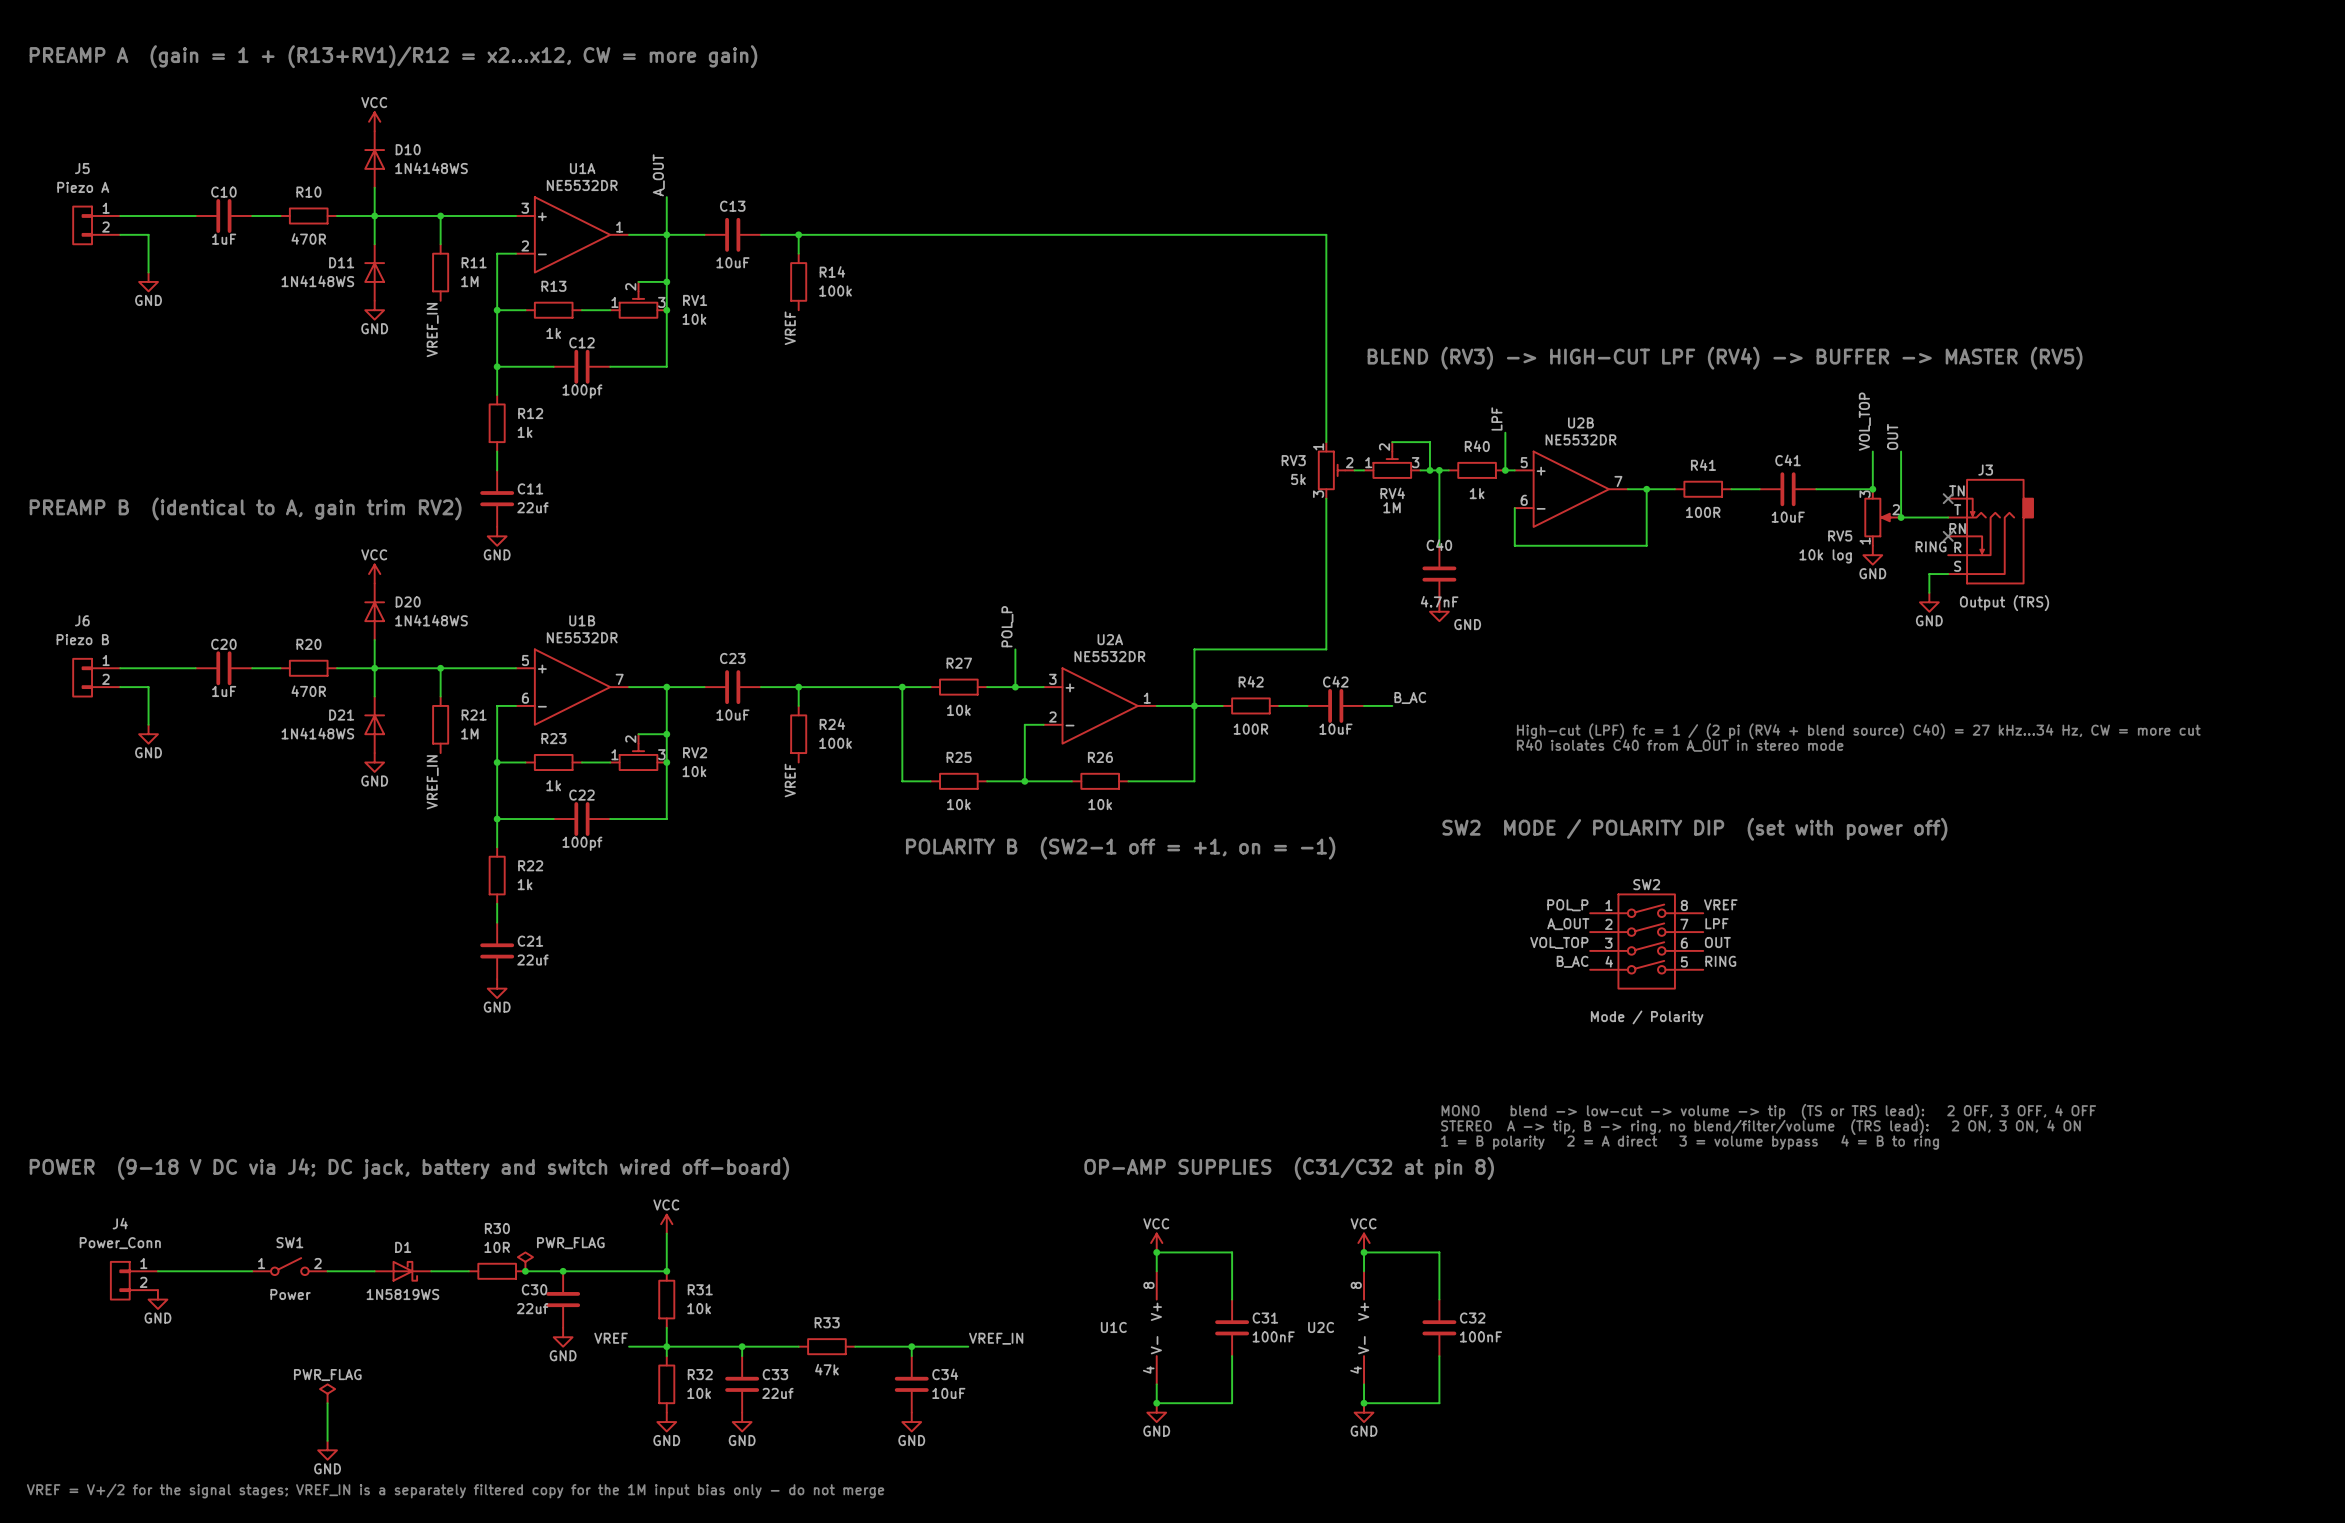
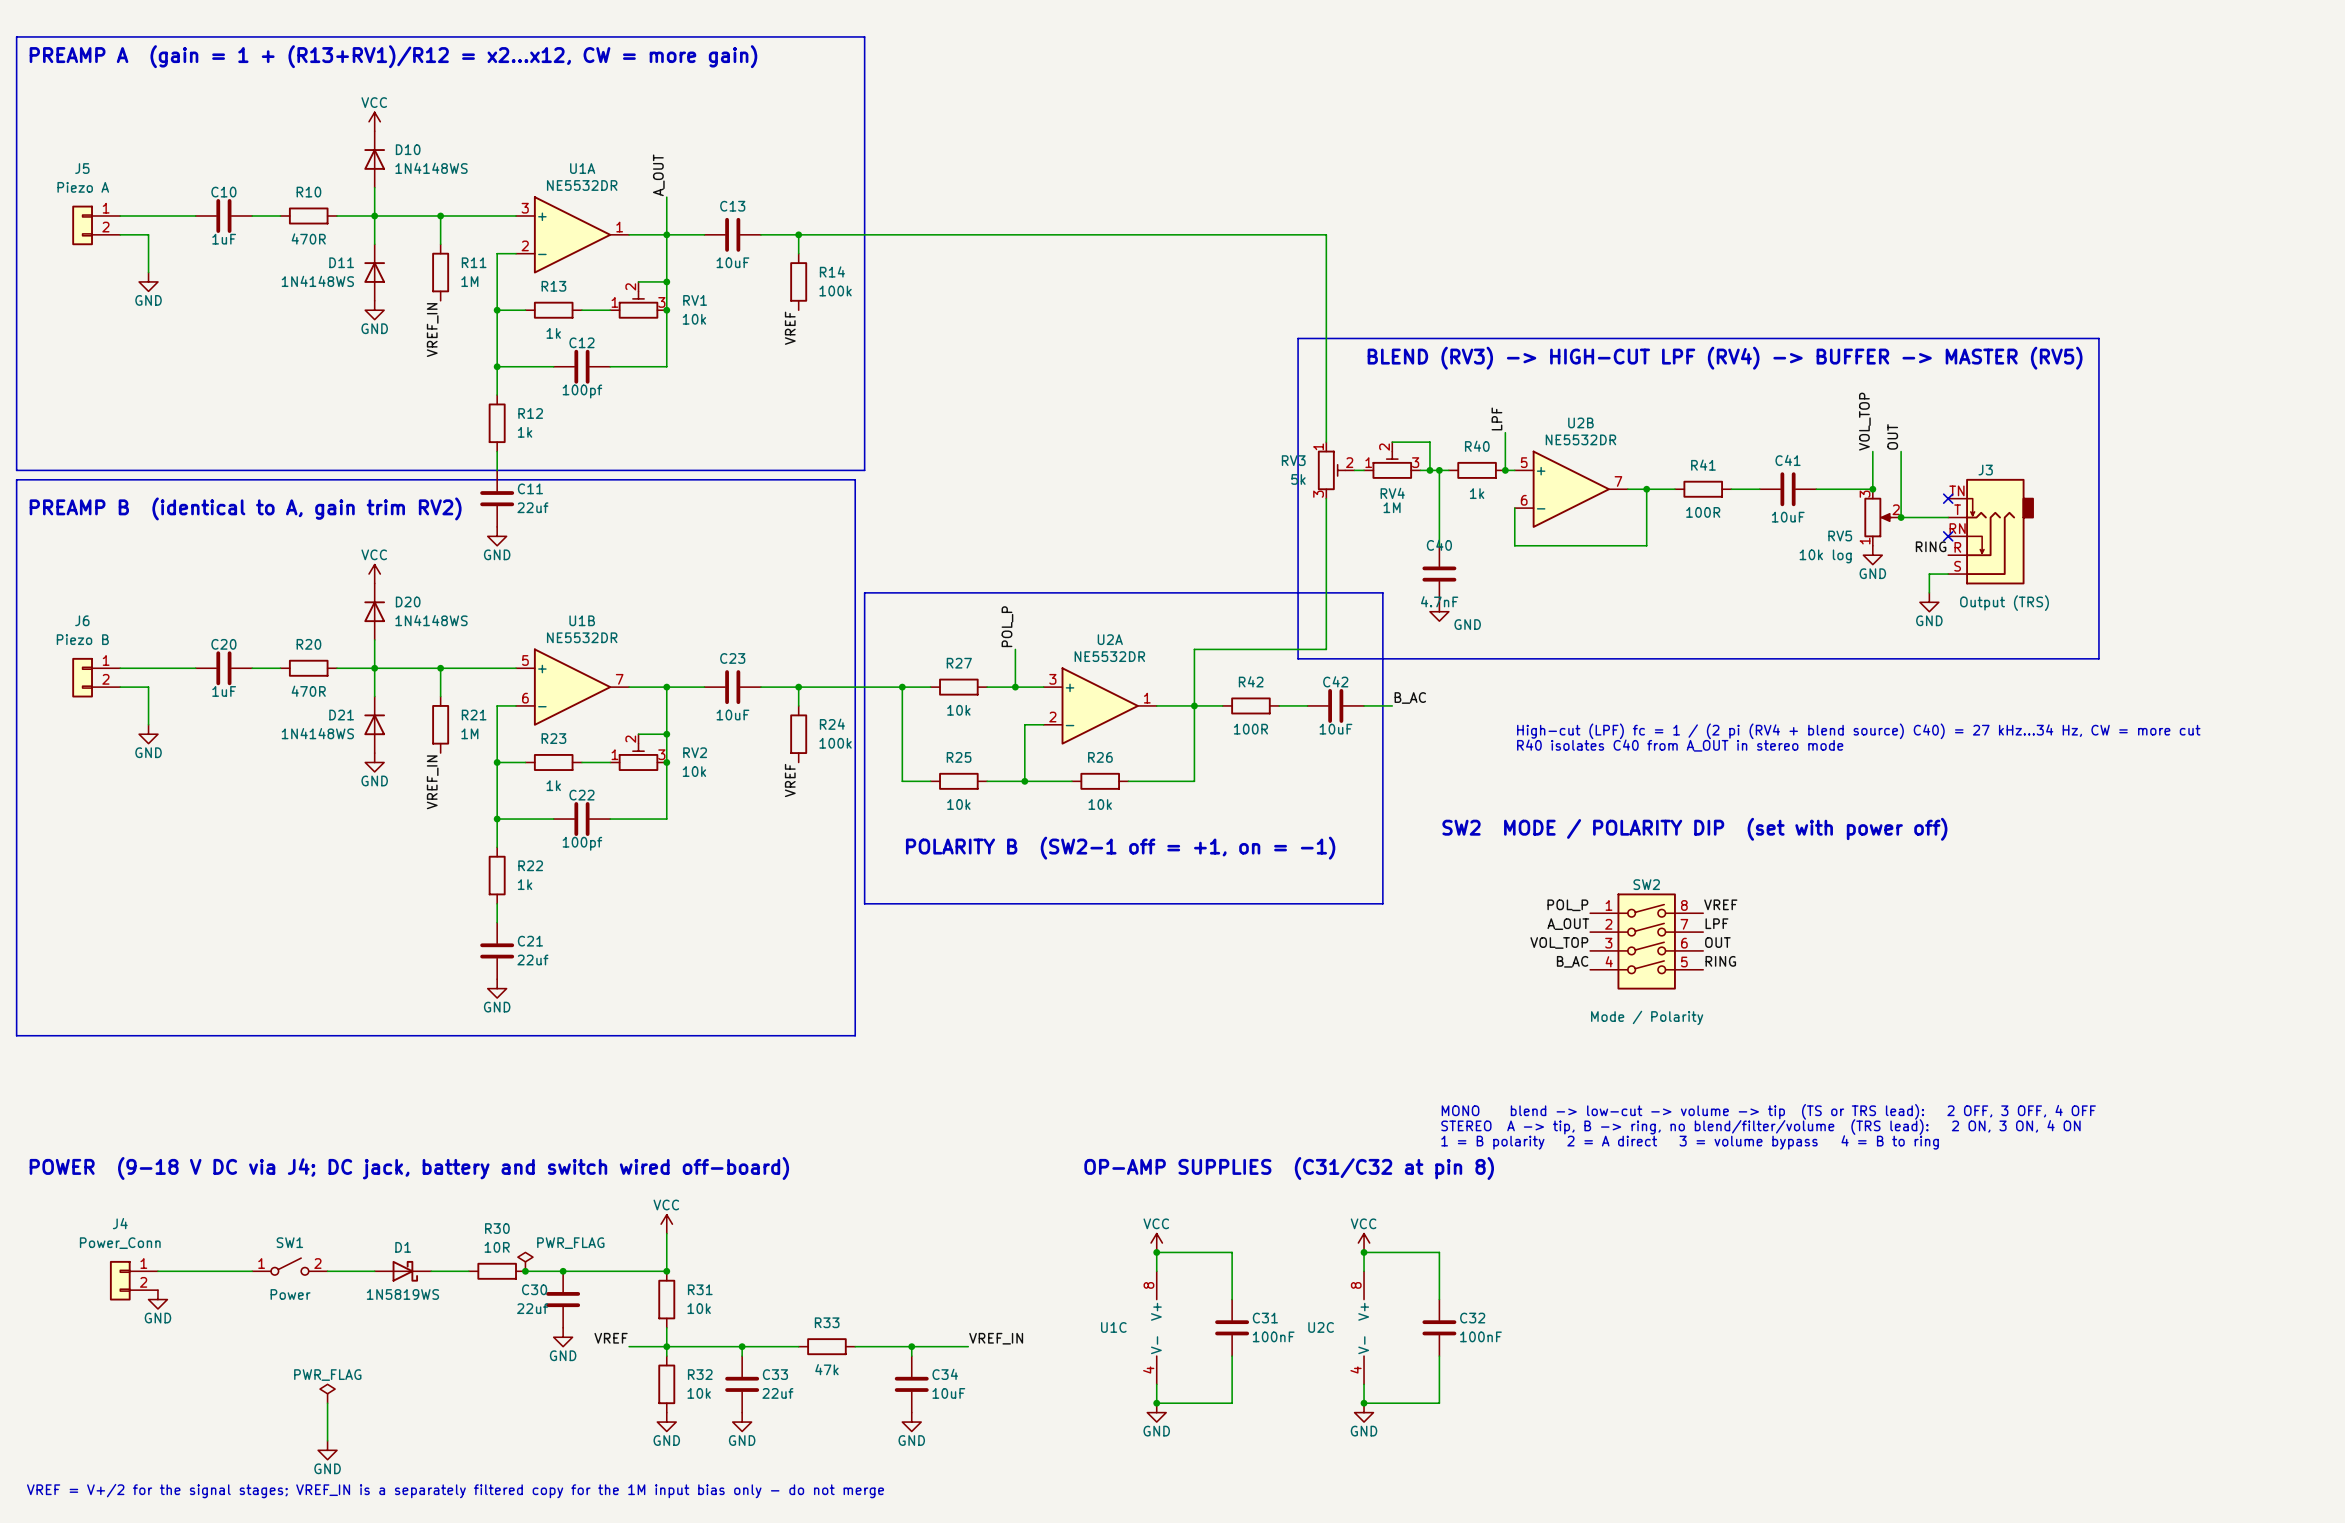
line: none -> (16, 36) (864, 36) (864, 470) (16, 470) (16, 36)
line: none -> (1298, 338) (2098, 338) (2098, 658) (1298, 658) (1298, 338)
line: none -> (16, 479) (16, 1035) (855, 1035) (855, 479) (16, 479)
line: none -> (864, 592) (864, 903) (1382, 903) (1382, 592) (864, 592)

